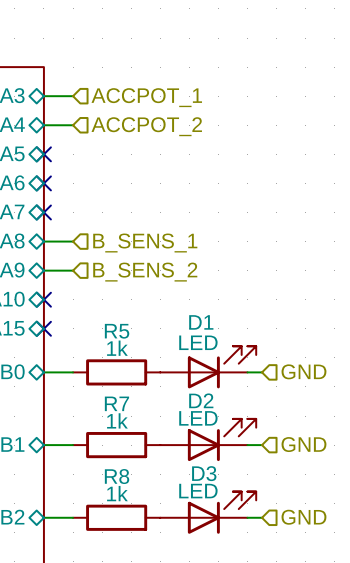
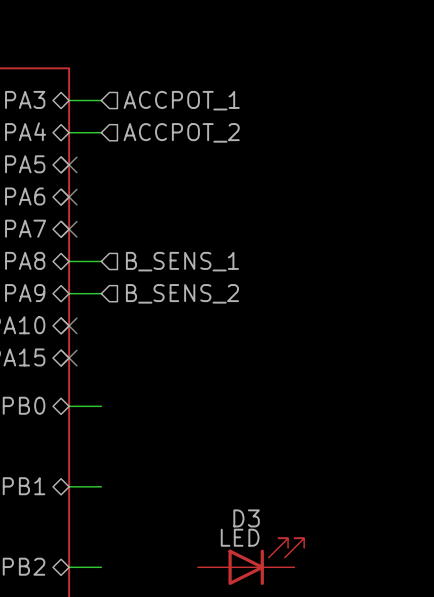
D1: LED (208, 367) -> none
hierarchical label: GND (303, 371) -> none
R5: 1k (116, 372) -> none
wire: (247, 372) (262, 372) -> none
D2: LED (208, 440) -> none
hierarchical label: GND (303, 444) -> none
R7: 1k (116, 445) -> none
wire: (247, 445) (262, 445) -> none
R8: 1k (116, 517) -> none
wire: (247, 517) (262, 517) -> none
hierarchical label: GND (303, 517) -> none

